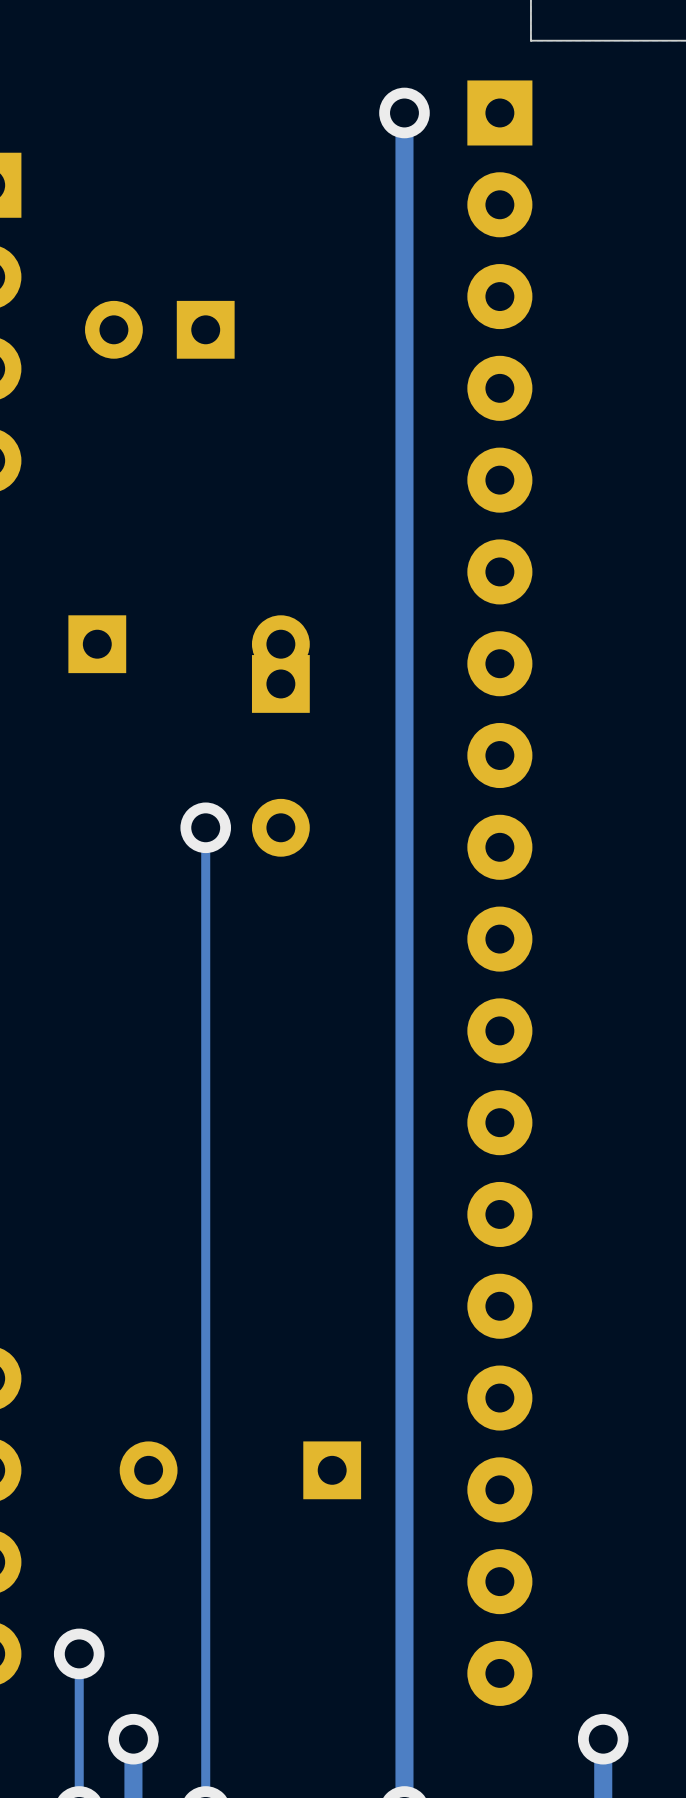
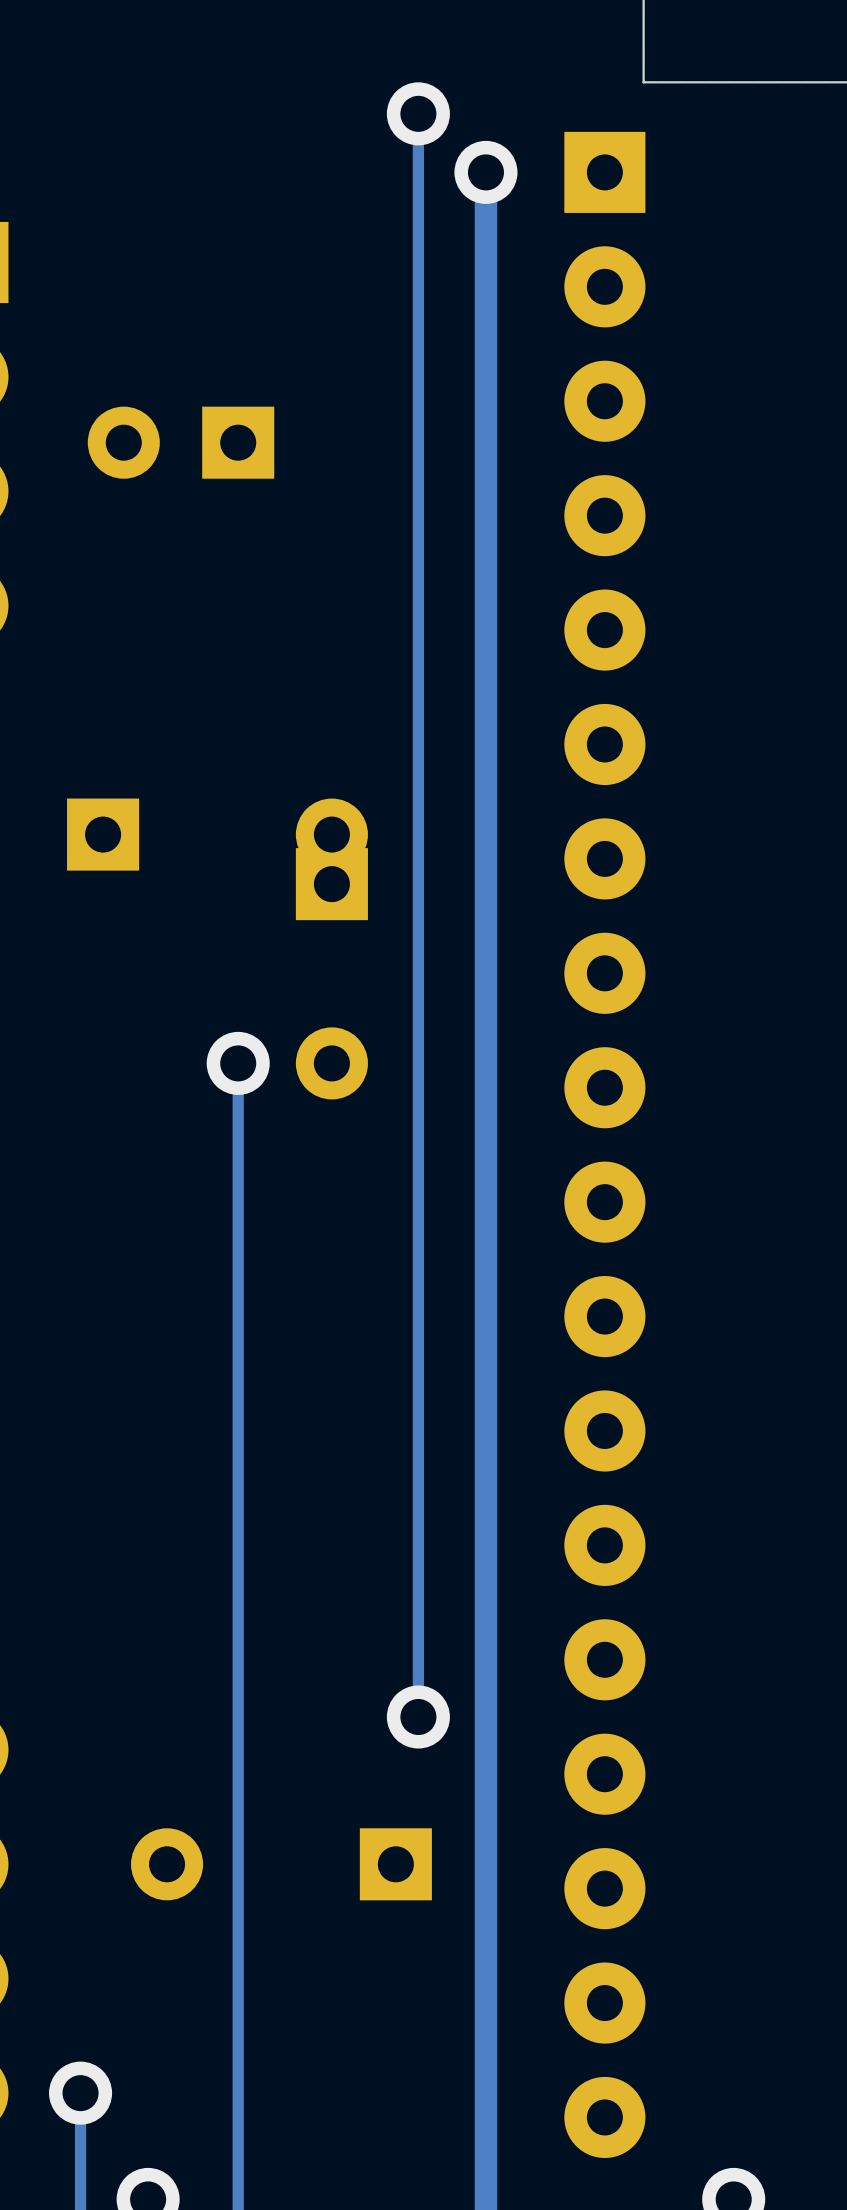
track: none -> (418, 113) (418, 1717)
via: none -> (418, 113)
via: none -> (418, 1717)

